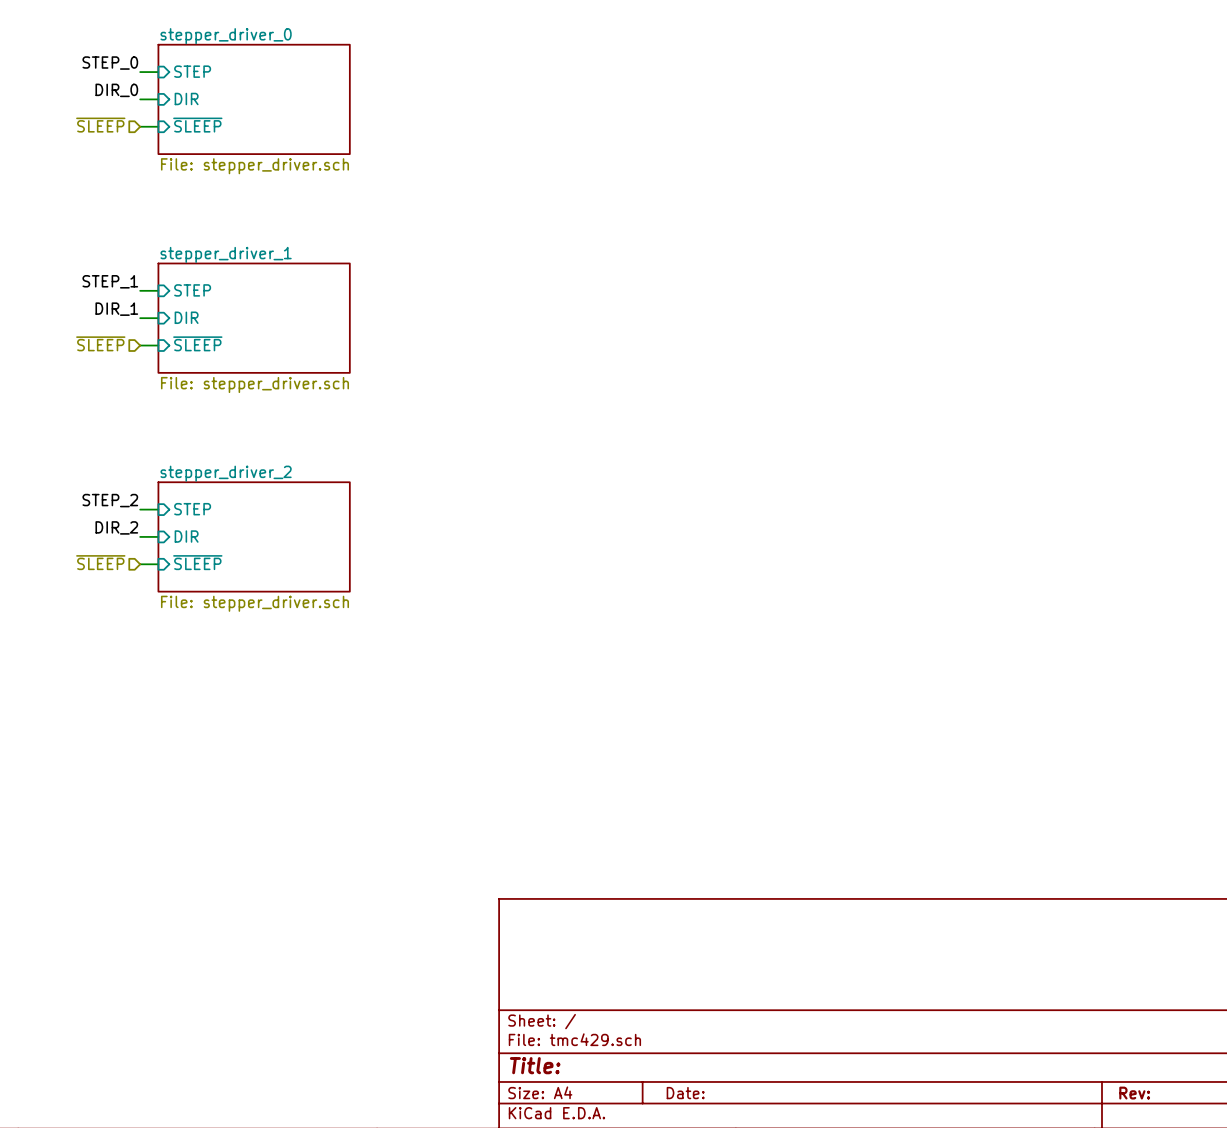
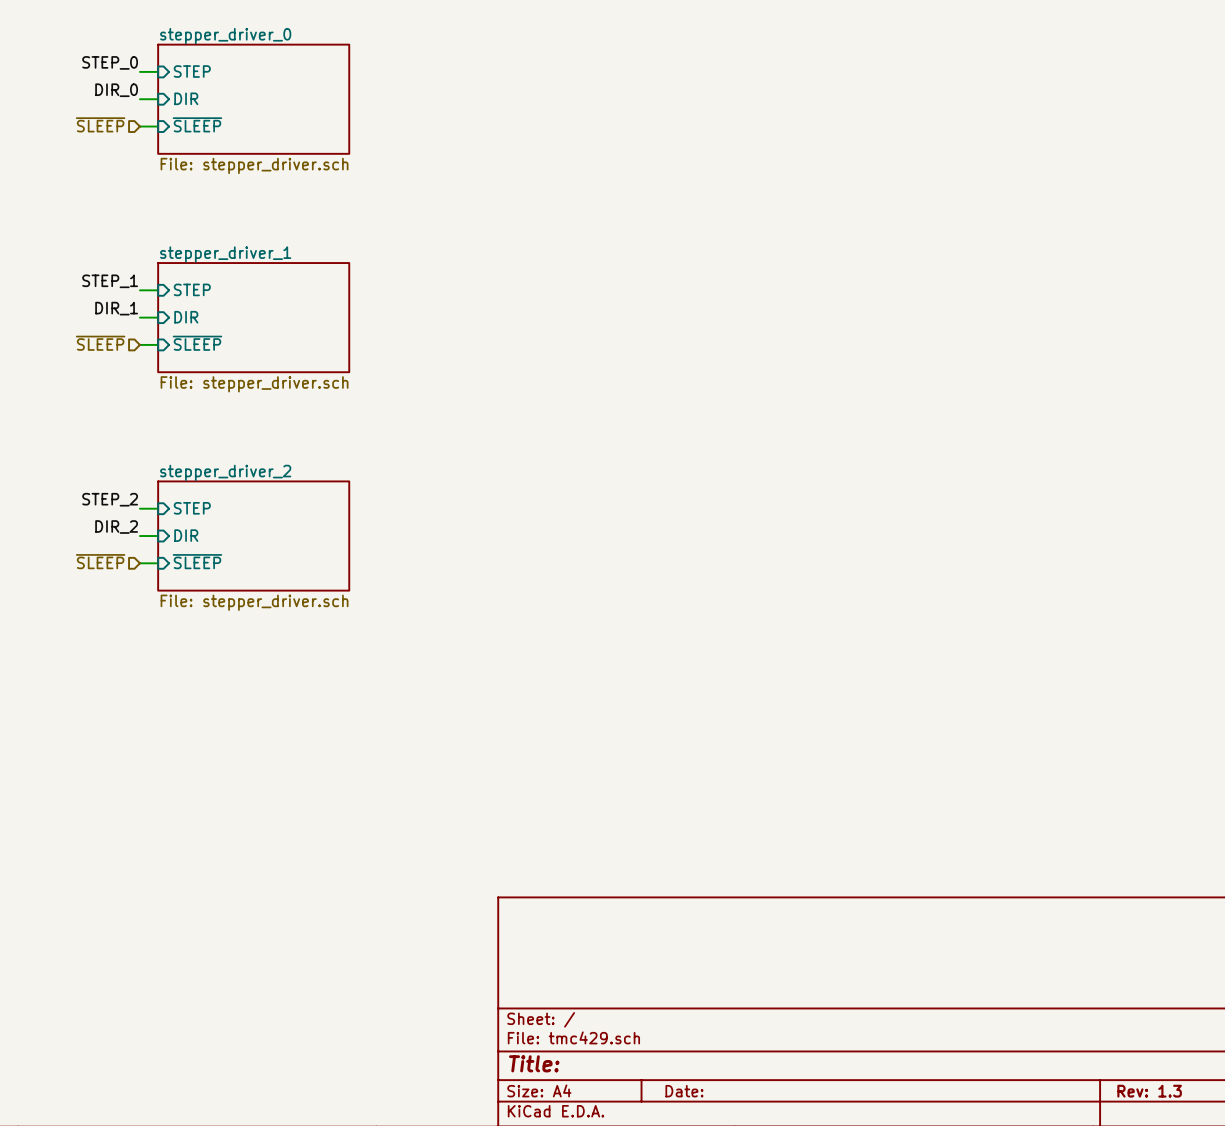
title block: Rev: (1134, 1093) -> Rev: 1.3 (1149, 1091)

